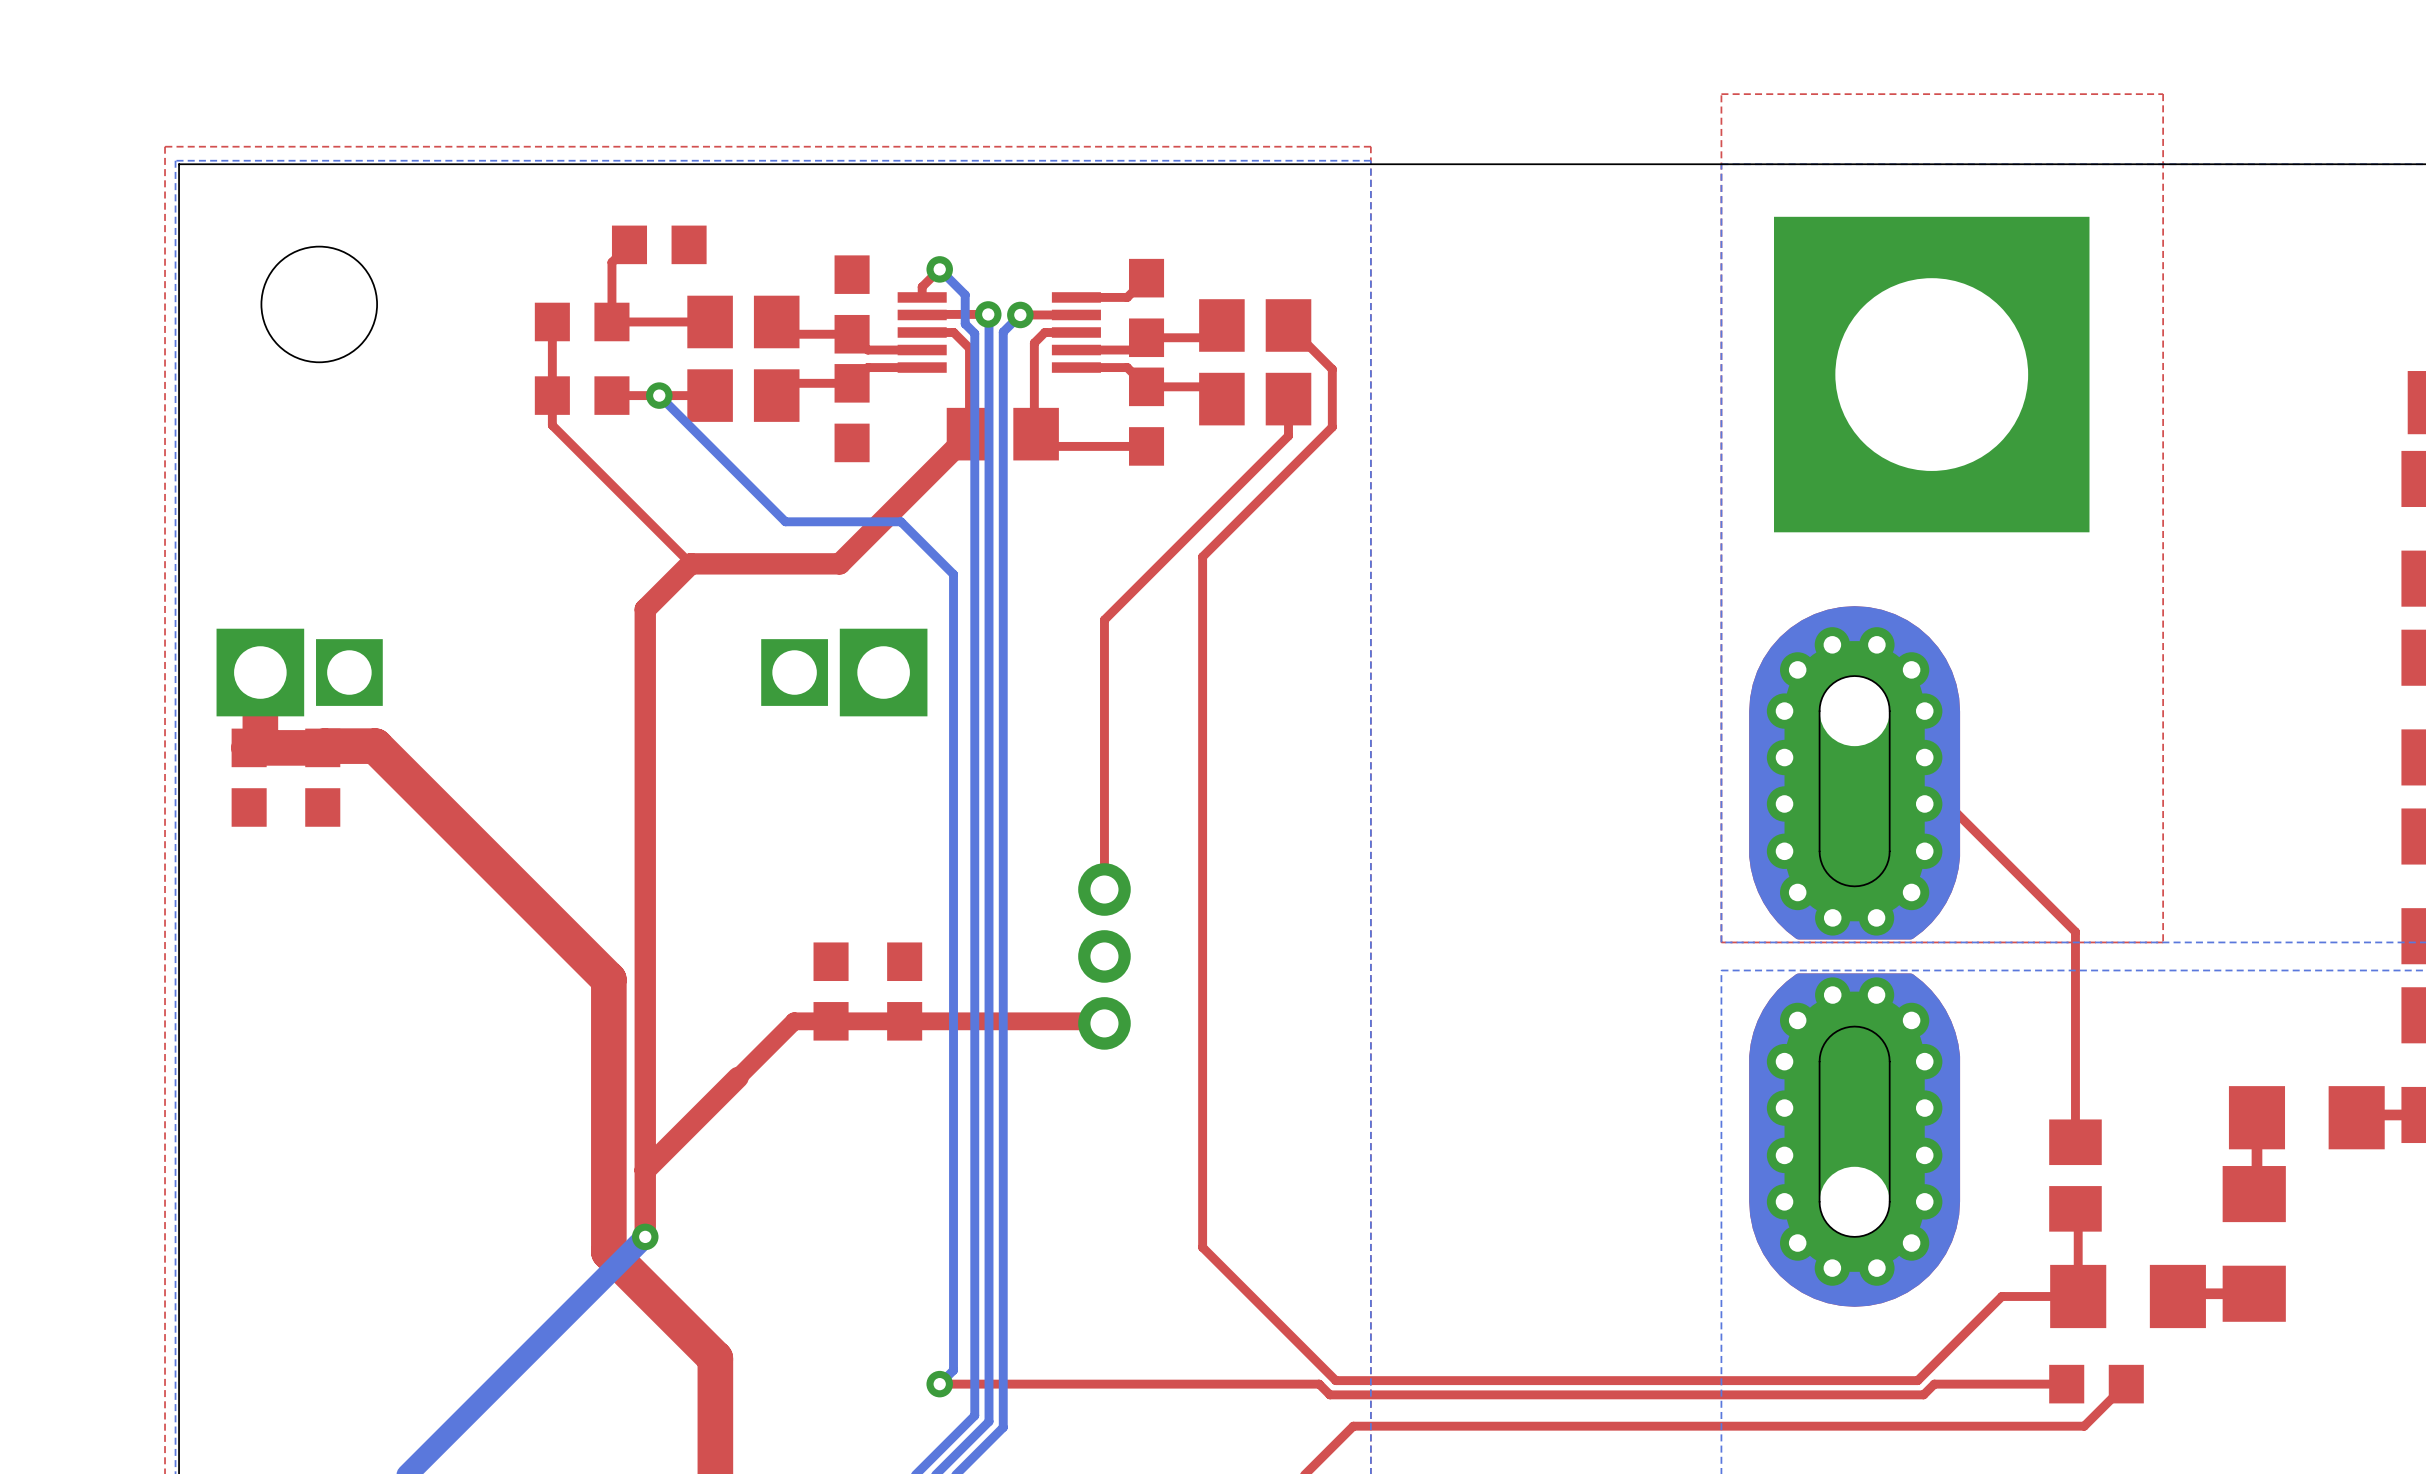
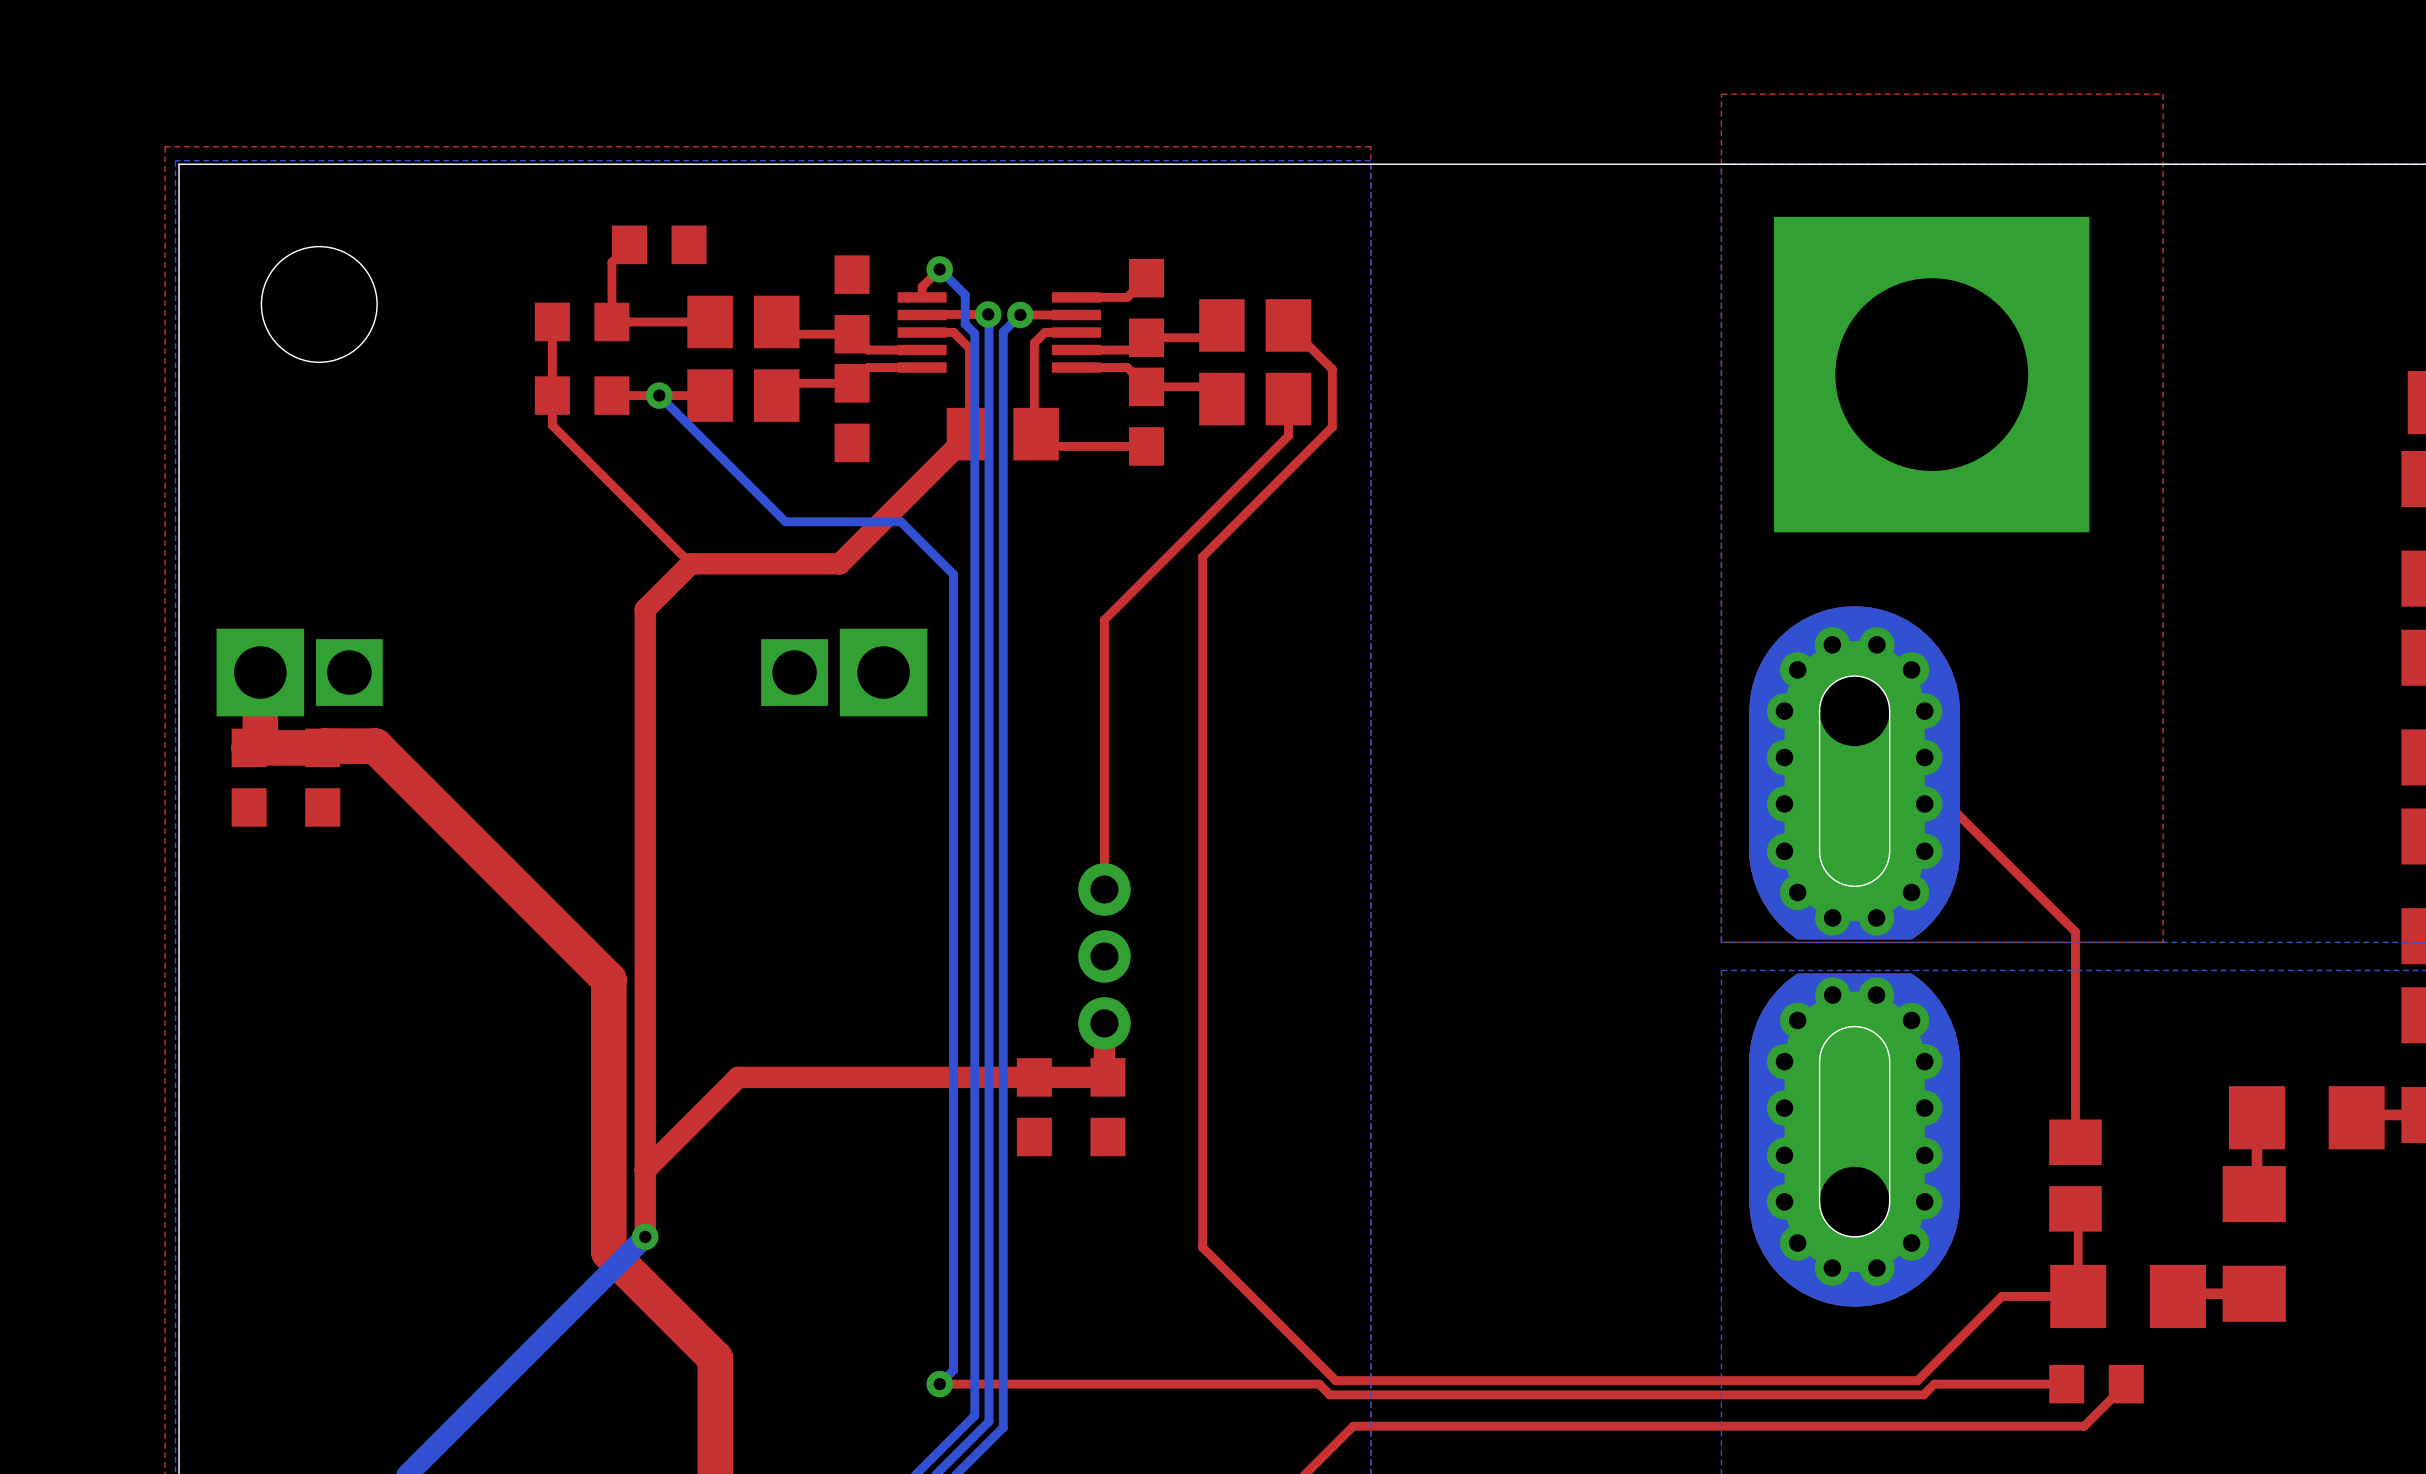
part: (831, 991) -> none
part: (904, 991) -> none
top track: (1104, 1023) (1102, 1021) (794, 1021) (738, 1077) -> (1104, 1023) (1104, 1073) (1107, 1077) (738, 1077)
part: none -> (1034, 1107)
part: none -> (1107, 1107)

